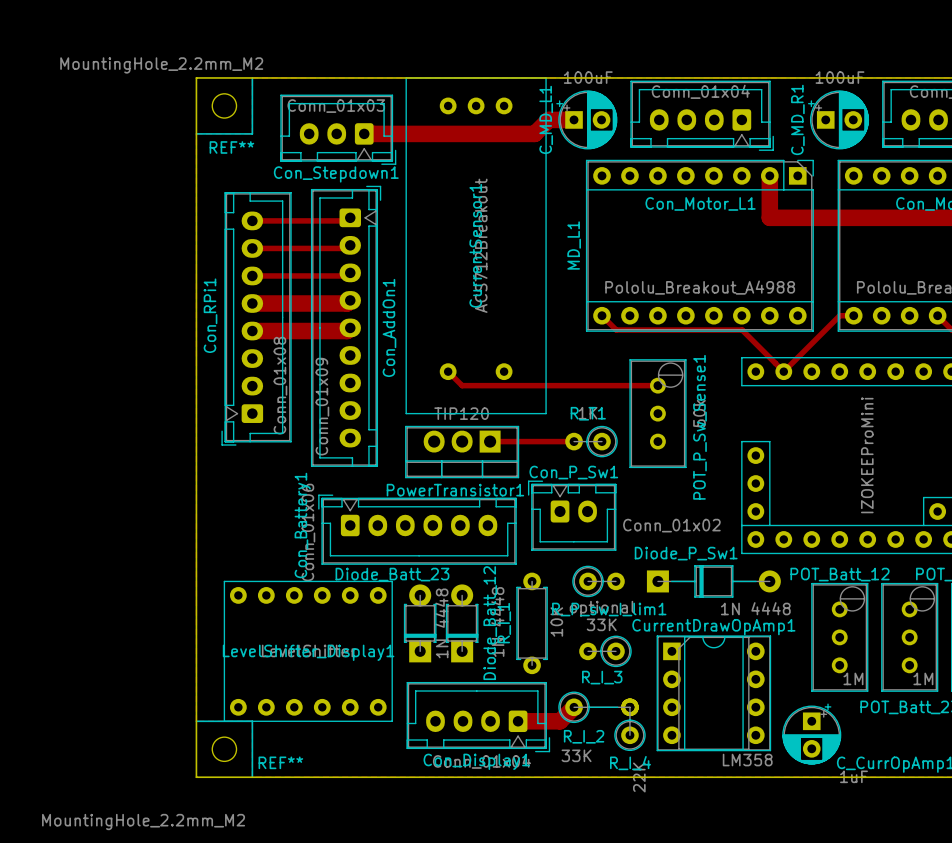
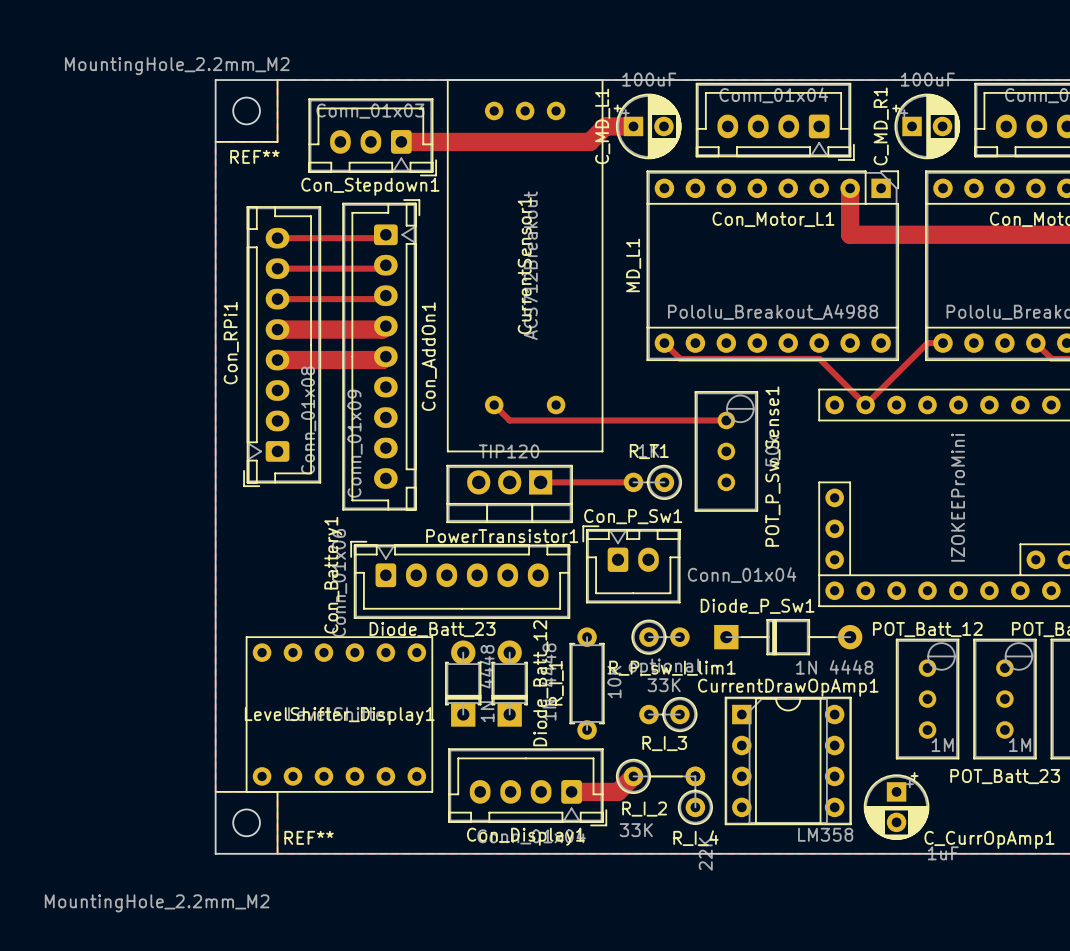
Con_P_Sw1 value: Conn_01x02 (671, 525) -> Conn_01x04 (742, 575)

